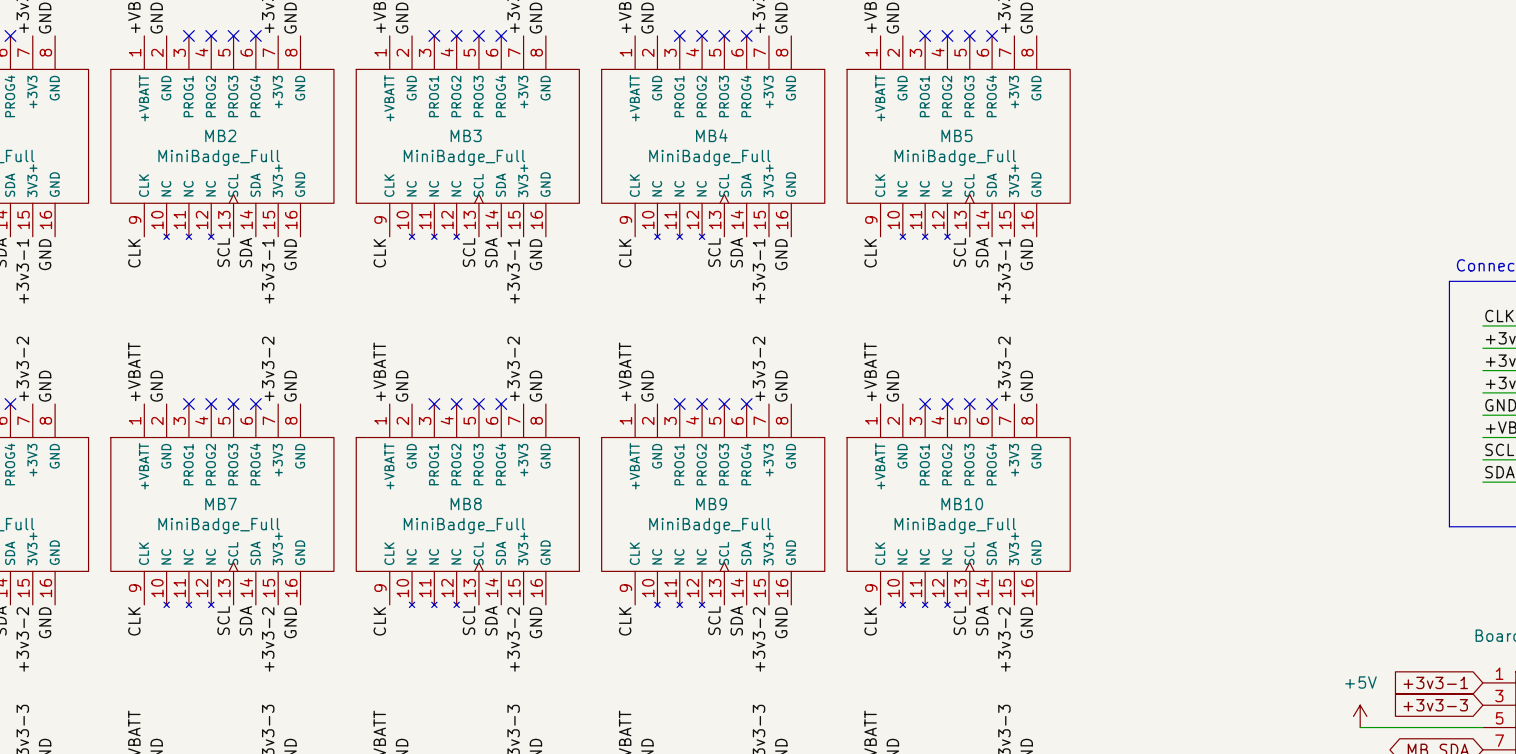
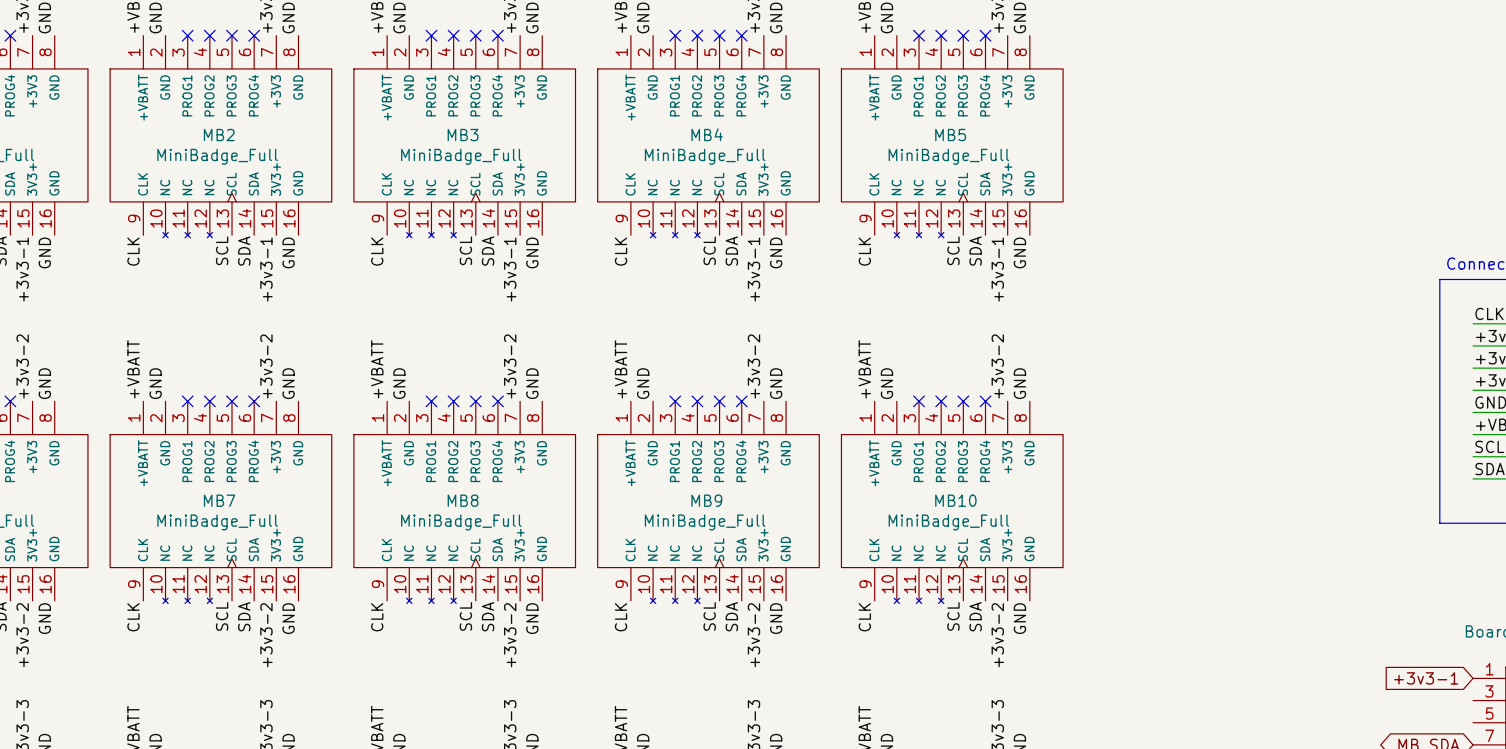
global label: +3v3-3 (1435, 705) -> none
power symbol: +5V (1360, 716) -> none
wire: (1360, 727) (1482, 727) -> none

